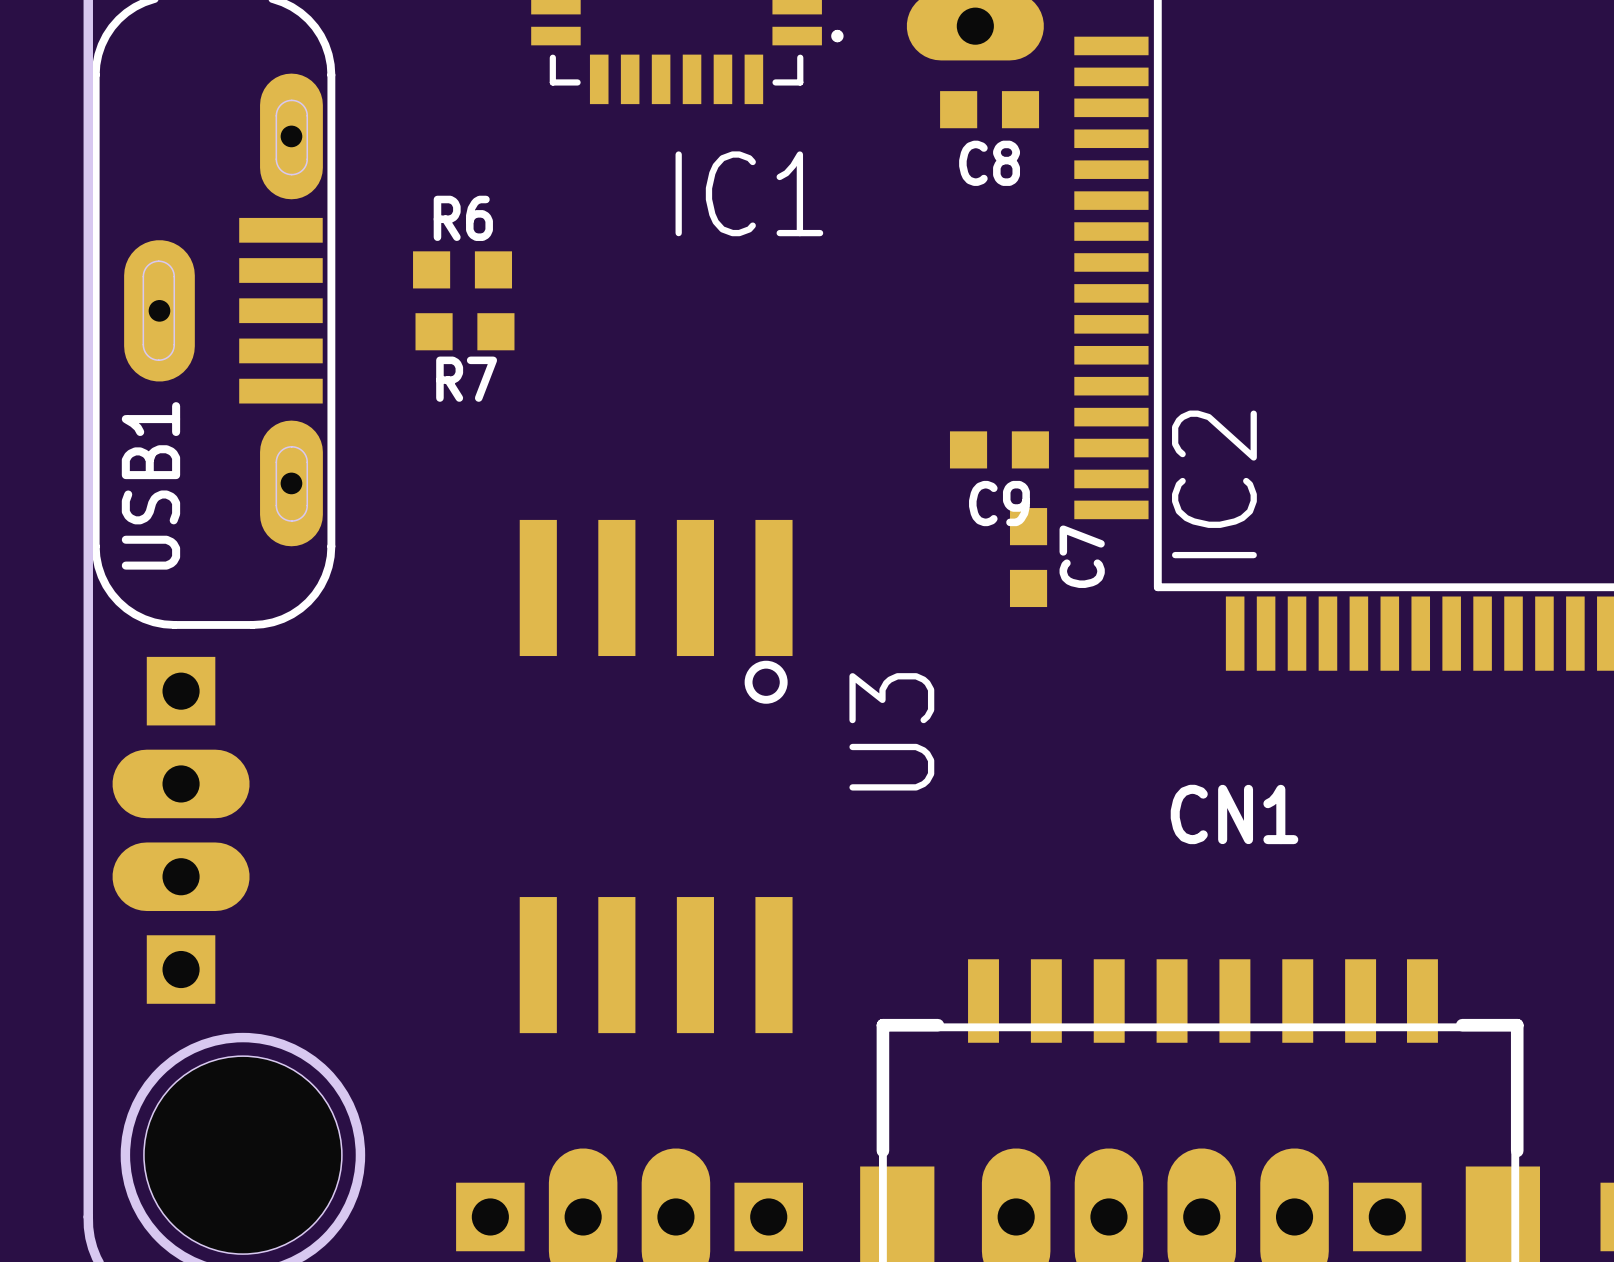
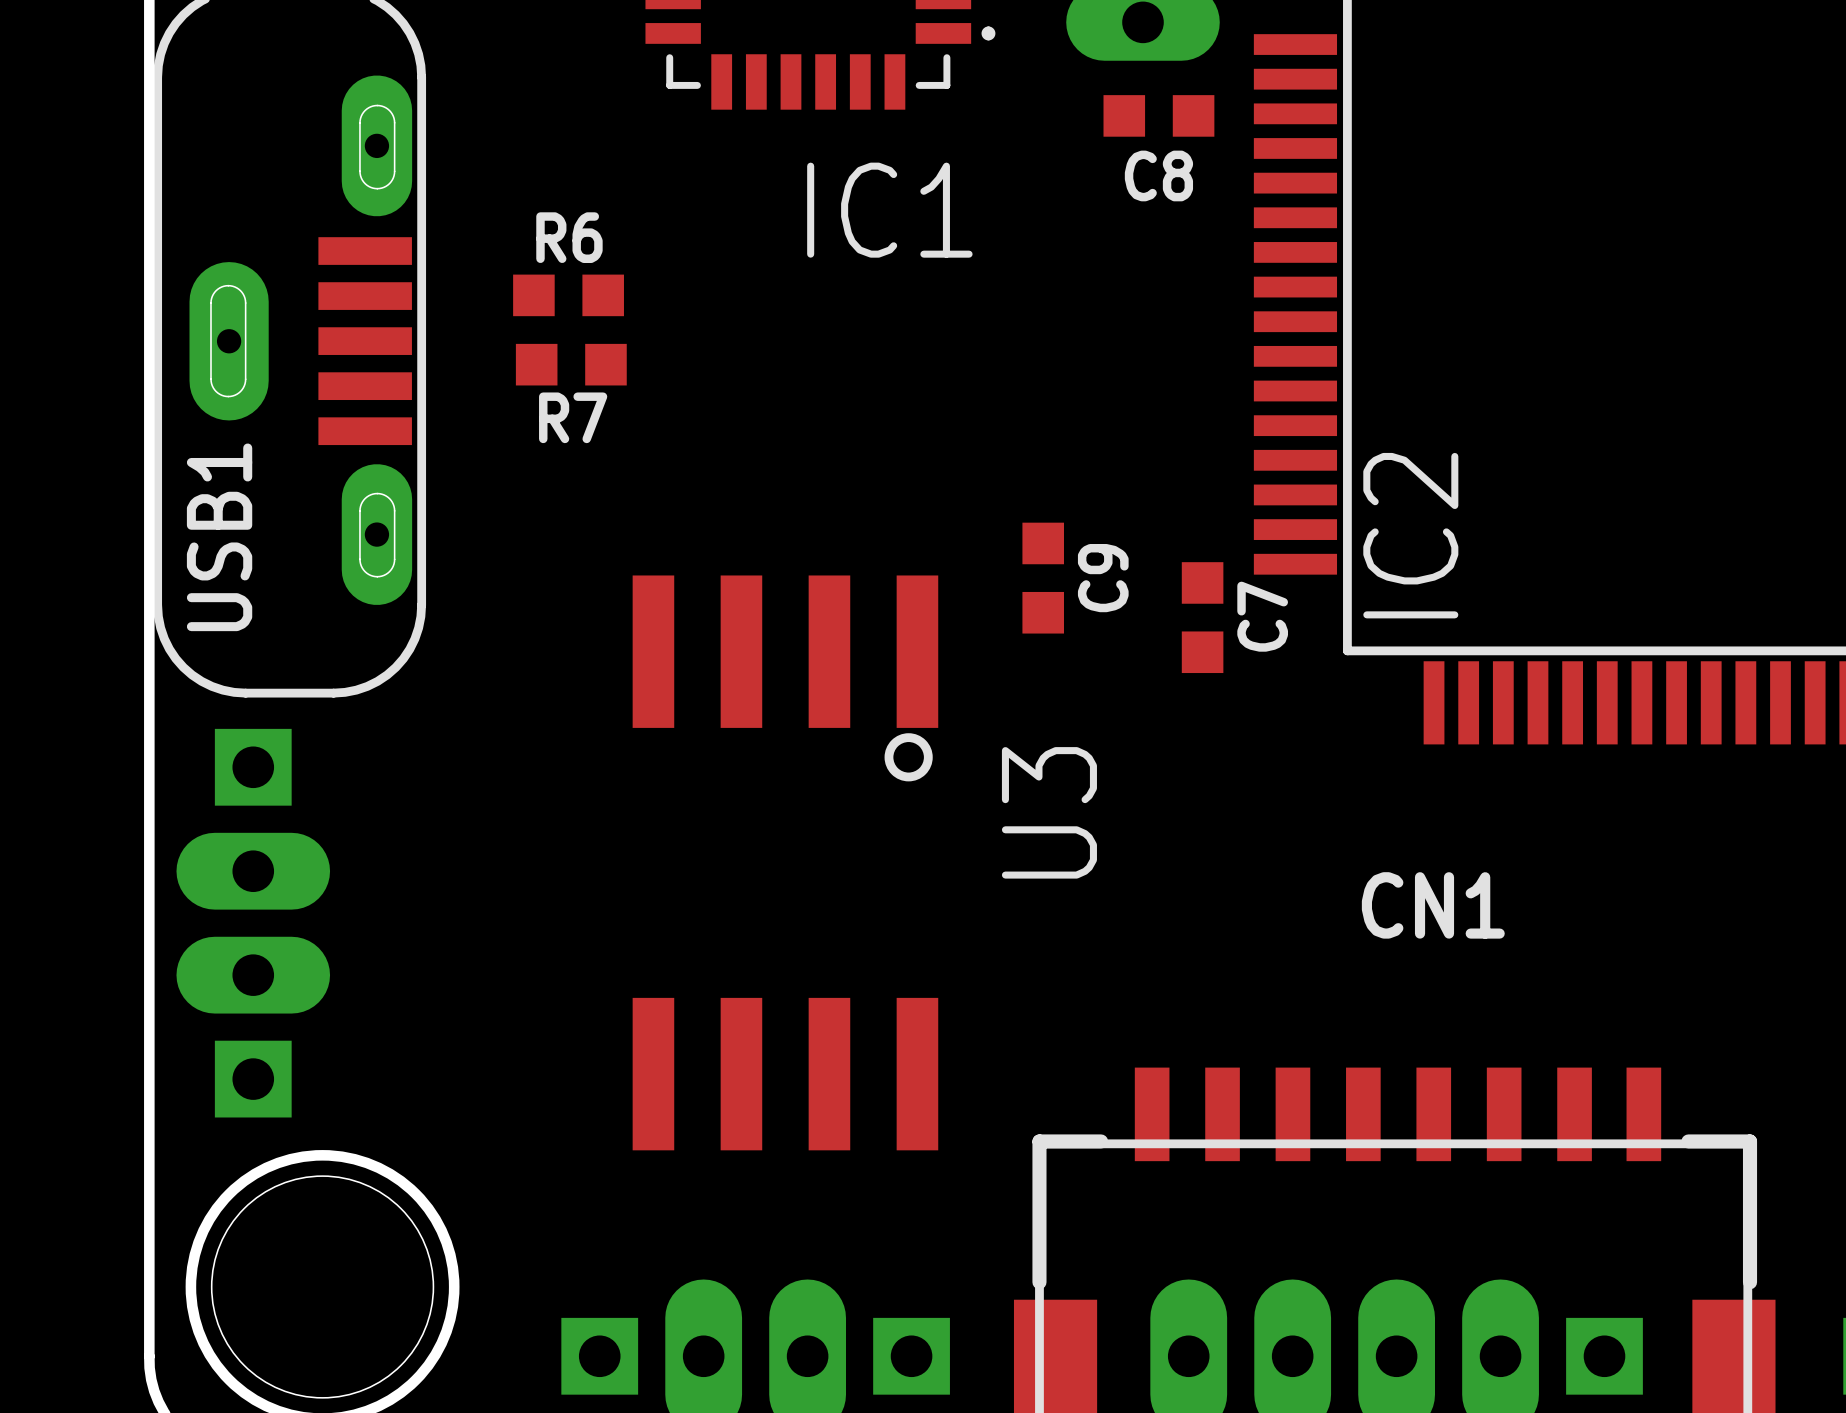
C9 rotation: 0° (999, 449) -> 90° clockwise (1043, 578)
C9 position: (999, 449) -> (1043, 578)

